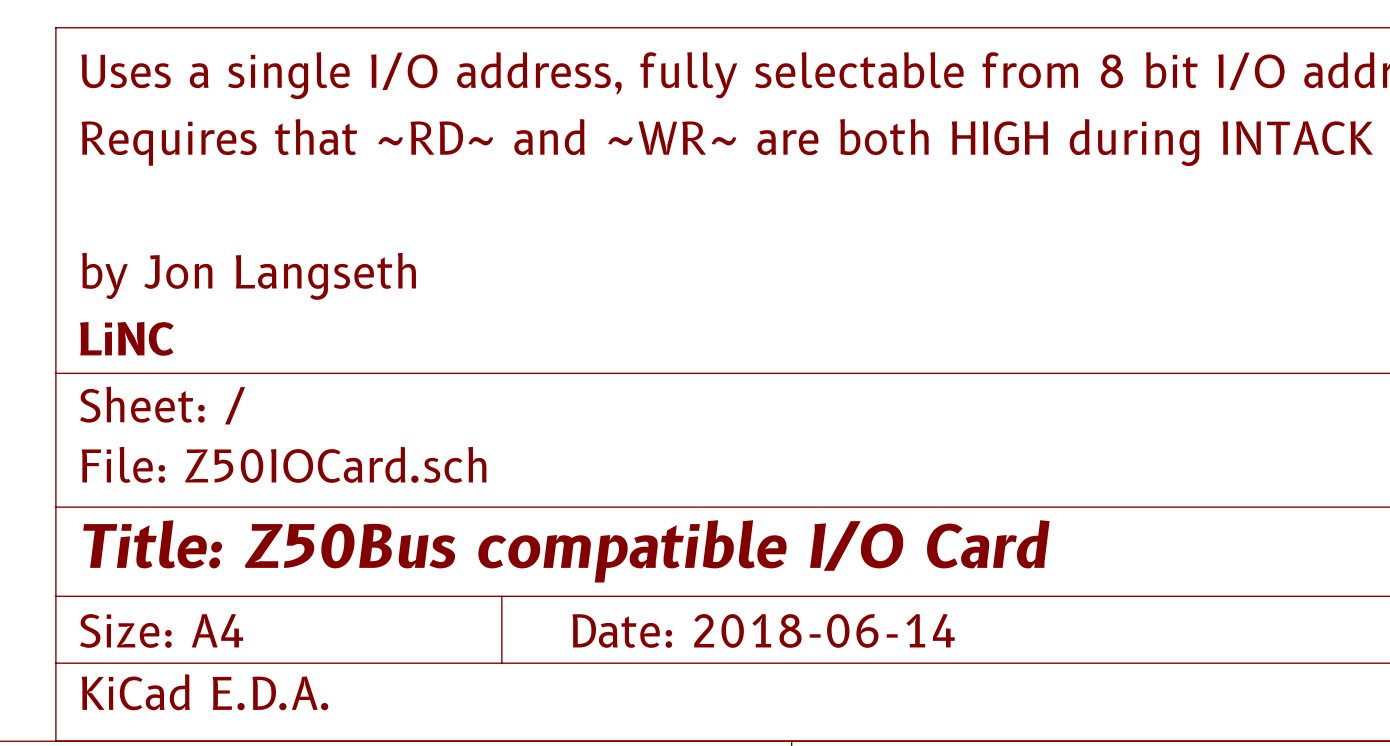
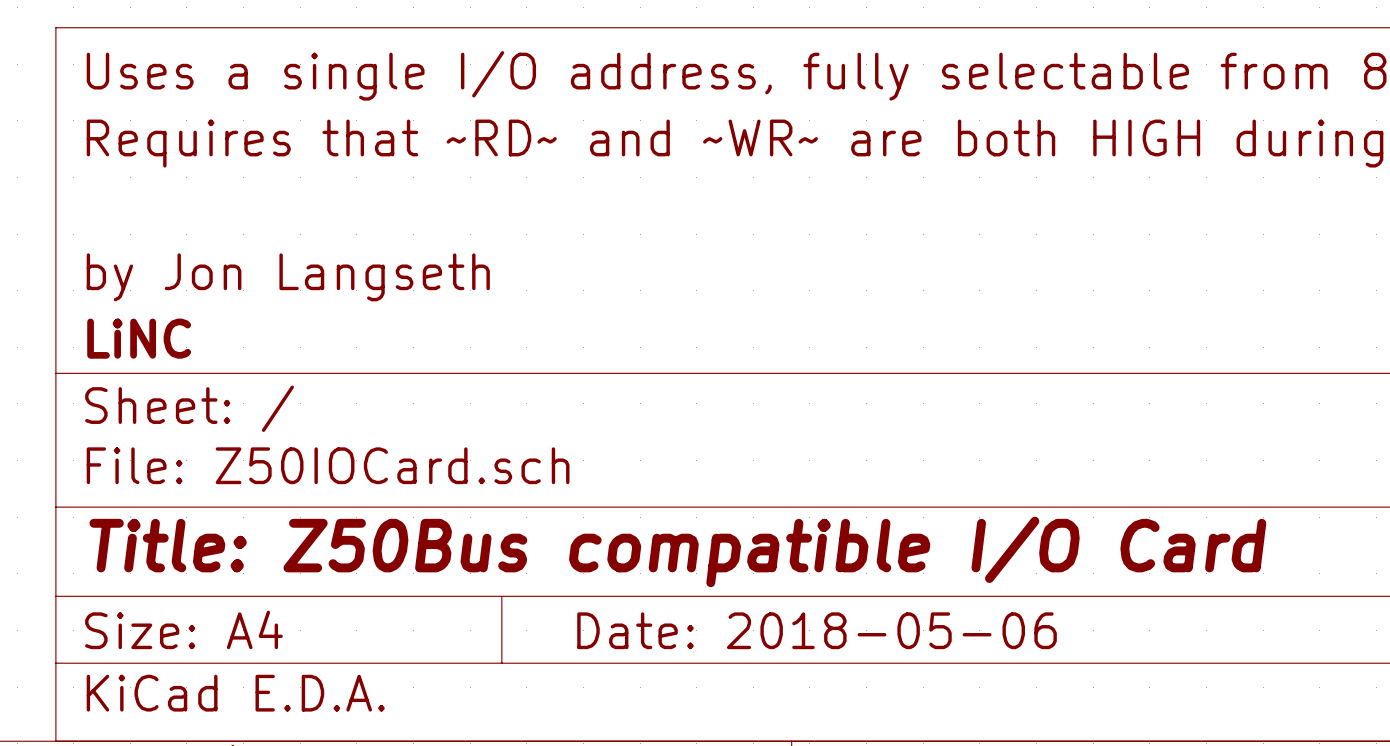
title block: Date: 2018-06-14 (763, 630) -> Date: 2018-05-06 (817, 630)

